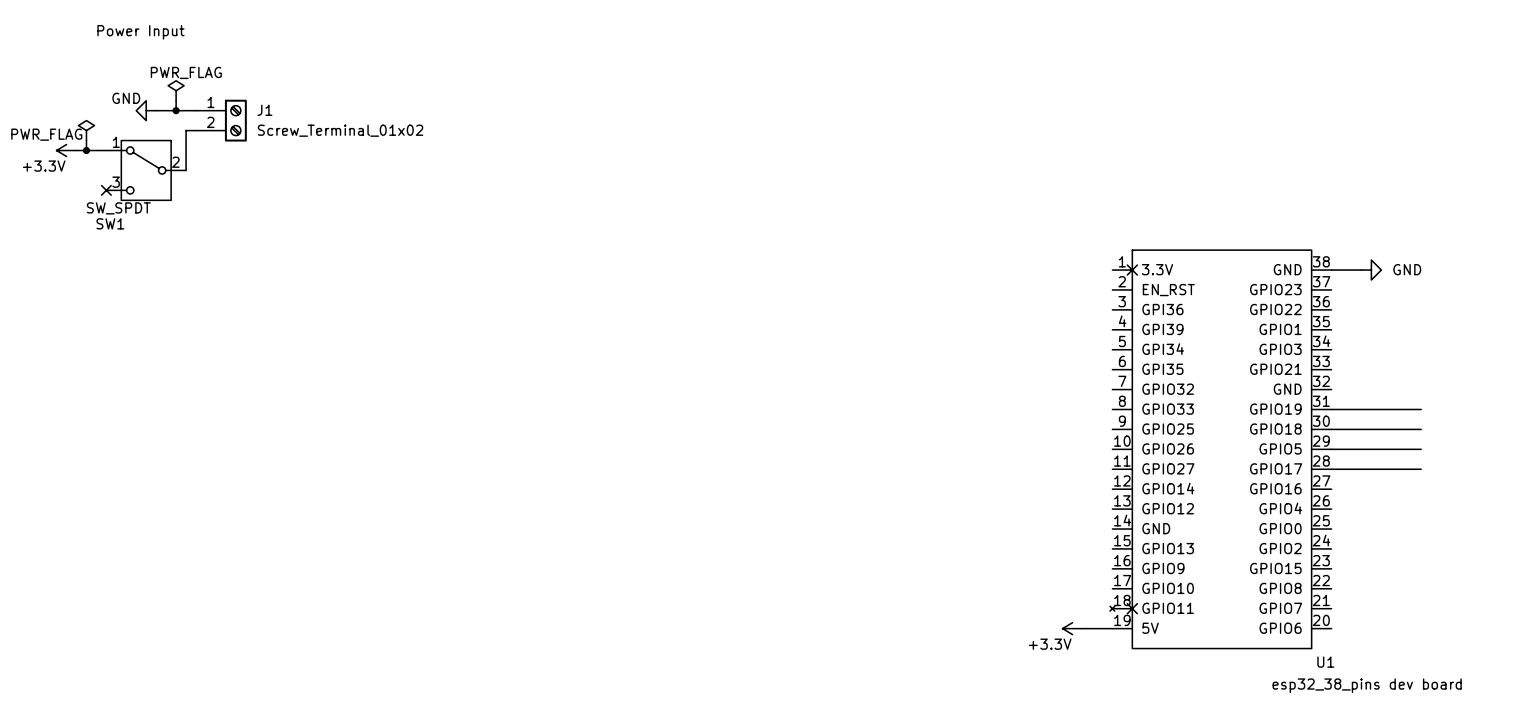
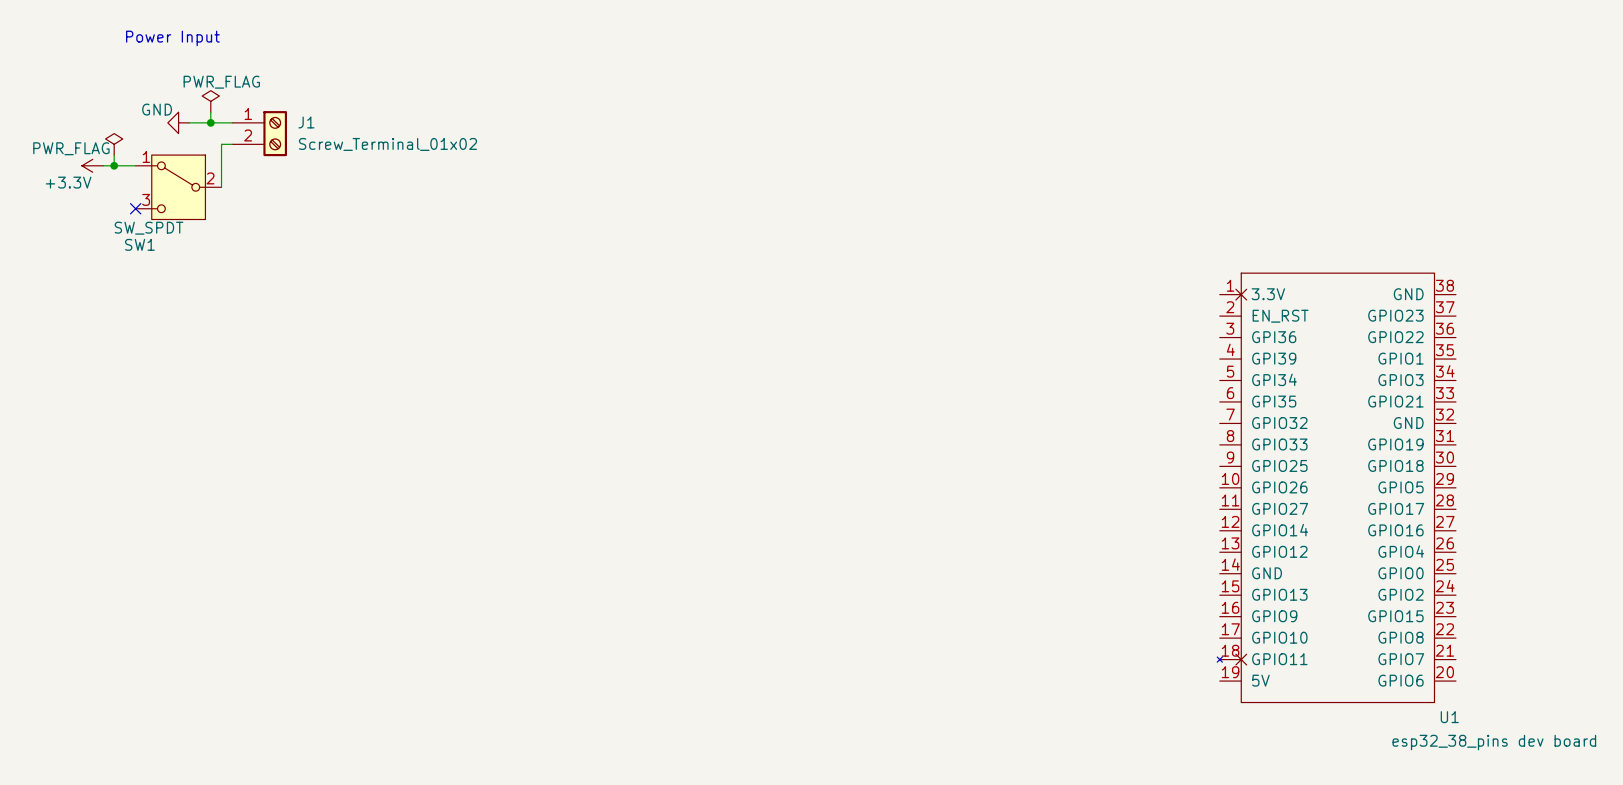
wire: (1331, 270) (1361, 270) -> none
power symbol: GND (1371, 270) -> none
wire: (1331, 409) (1421, 409) -> none
wire: (1331, 429) (1421, 429) -> none
wire: (1331, 449) (1421, 449) -> none
wire: (1331, 469) (1421, 469) -> none
power symbol: +3.3V (1072, 628) -> none
wire: (1082, 628) (1112, 628) -> none

